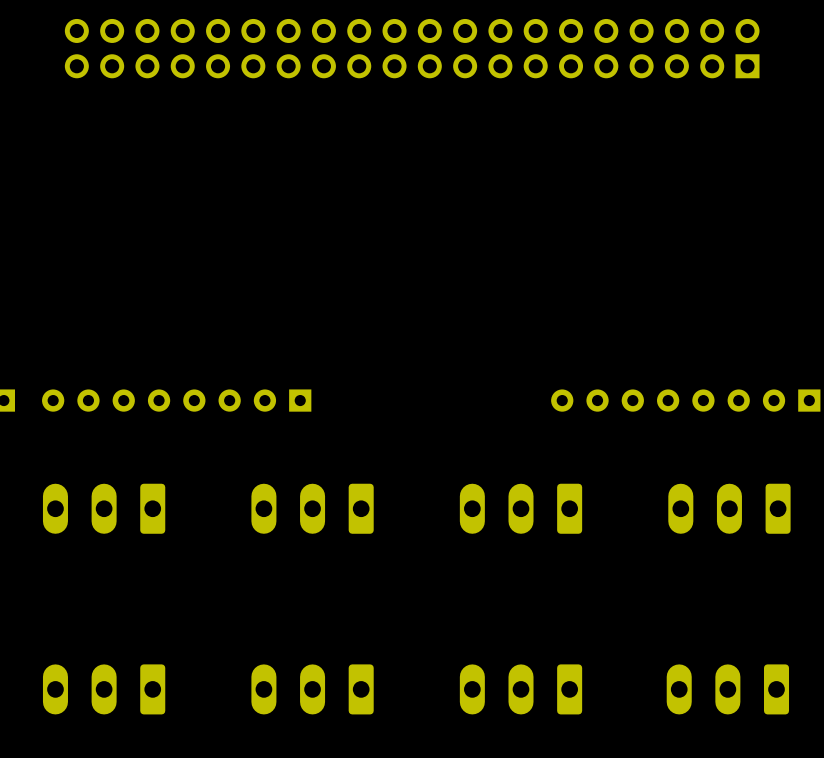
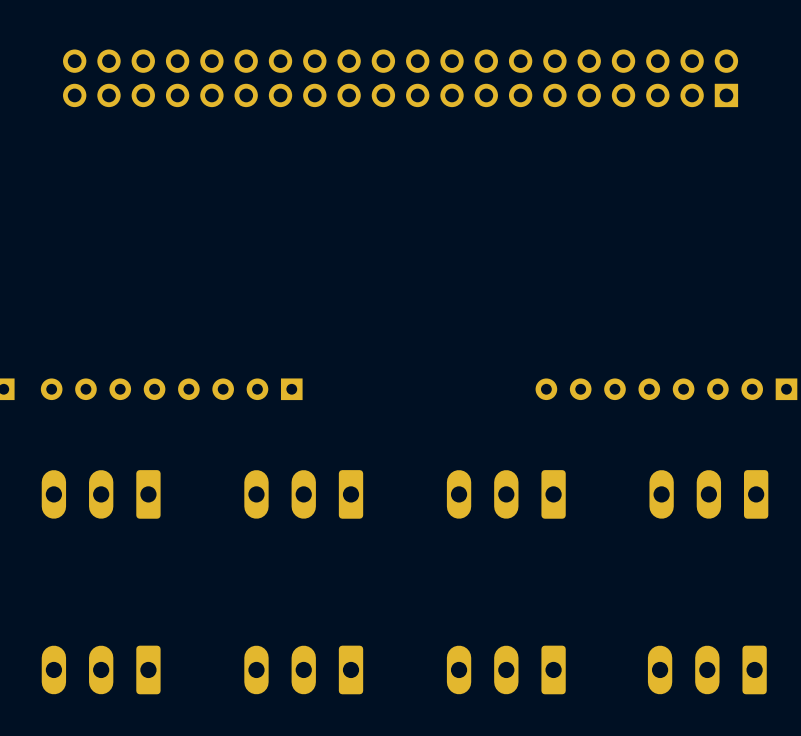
part position: (412, 48) -> (400, 78)

